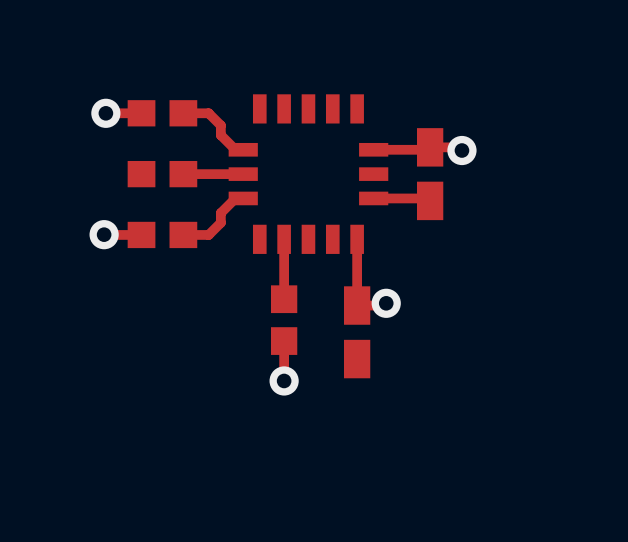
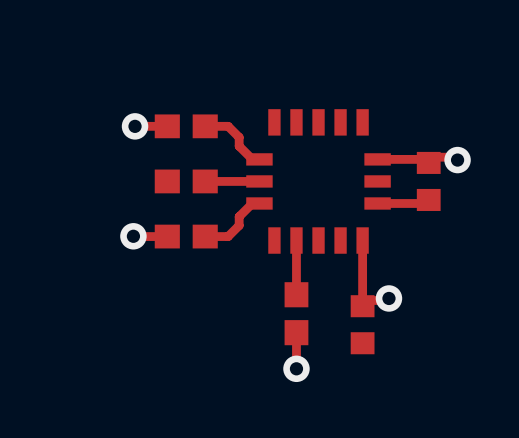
part footprint: [416, 128, 444, 221] -> [416, 151, 441, 211]
part footprint: [343, 286, 371, 379] -> [350, 295, 375, 355]

